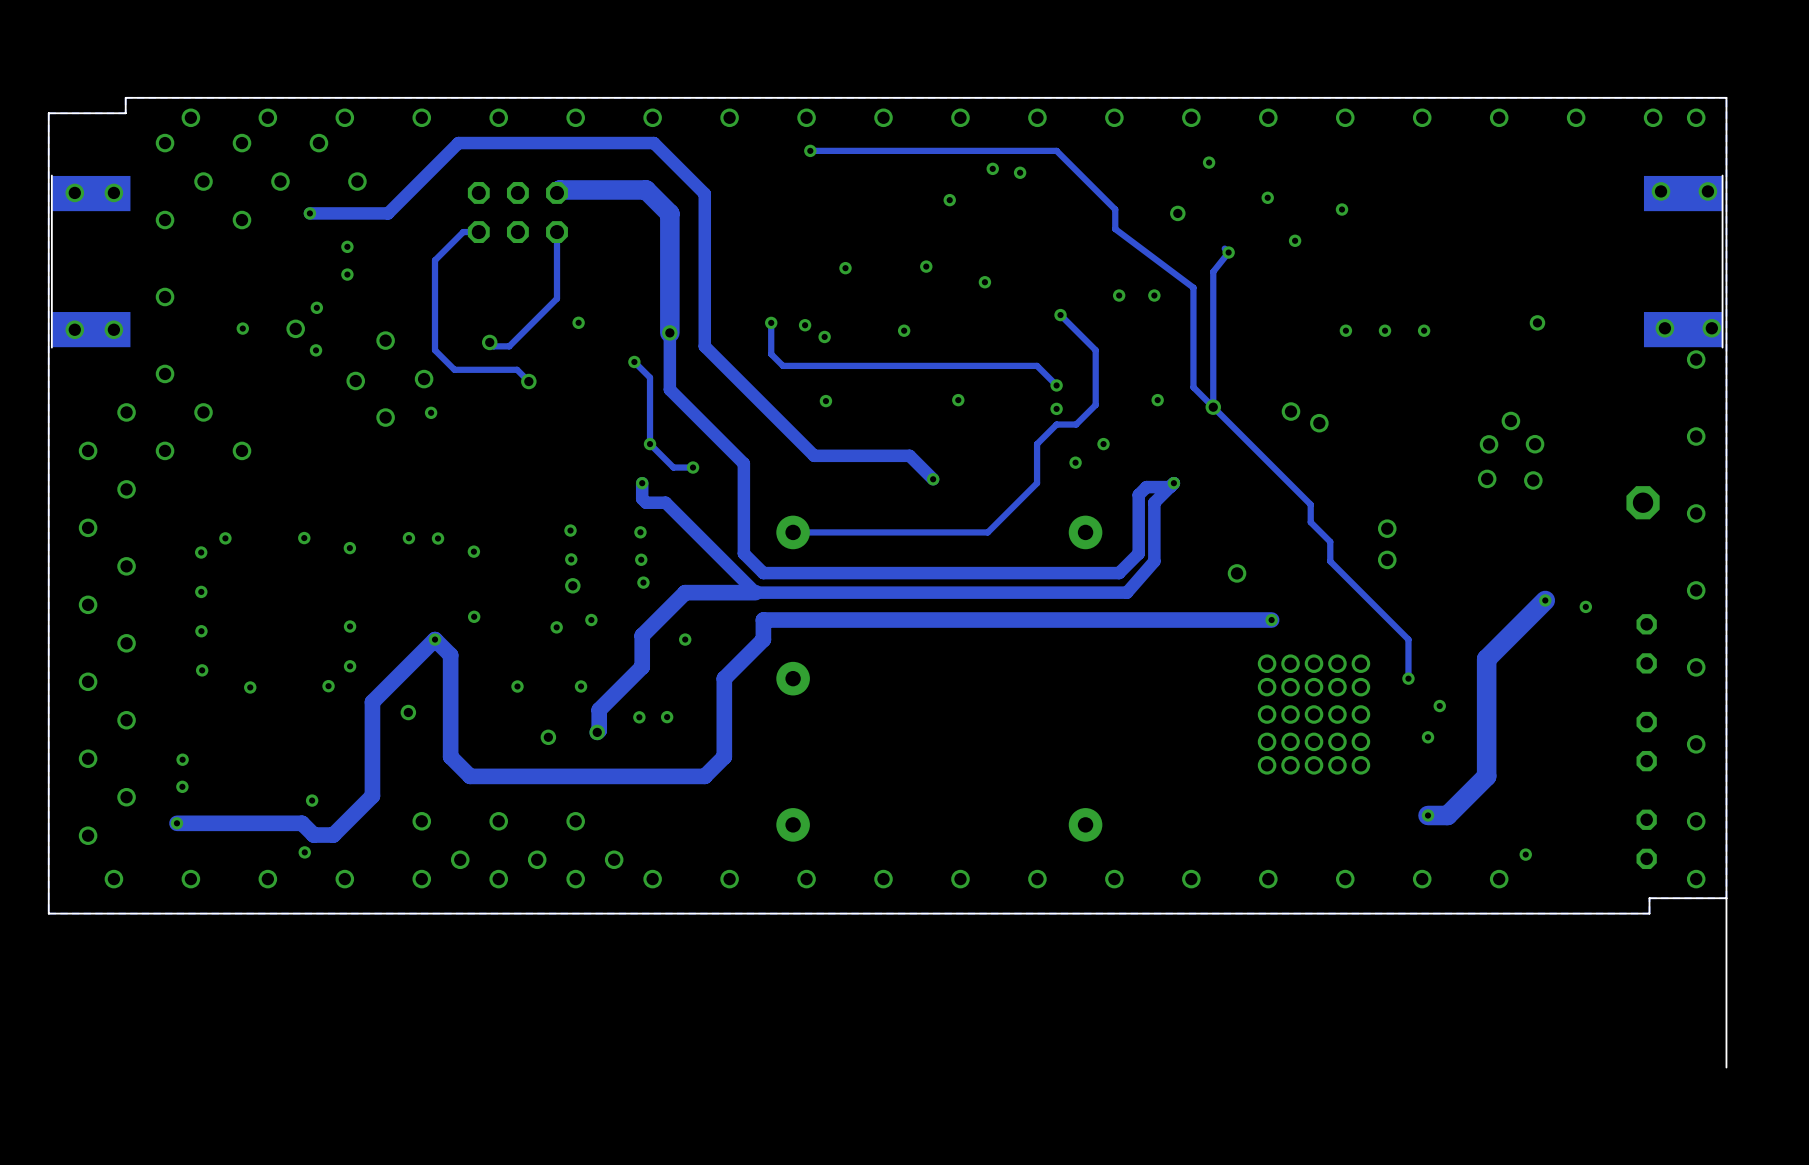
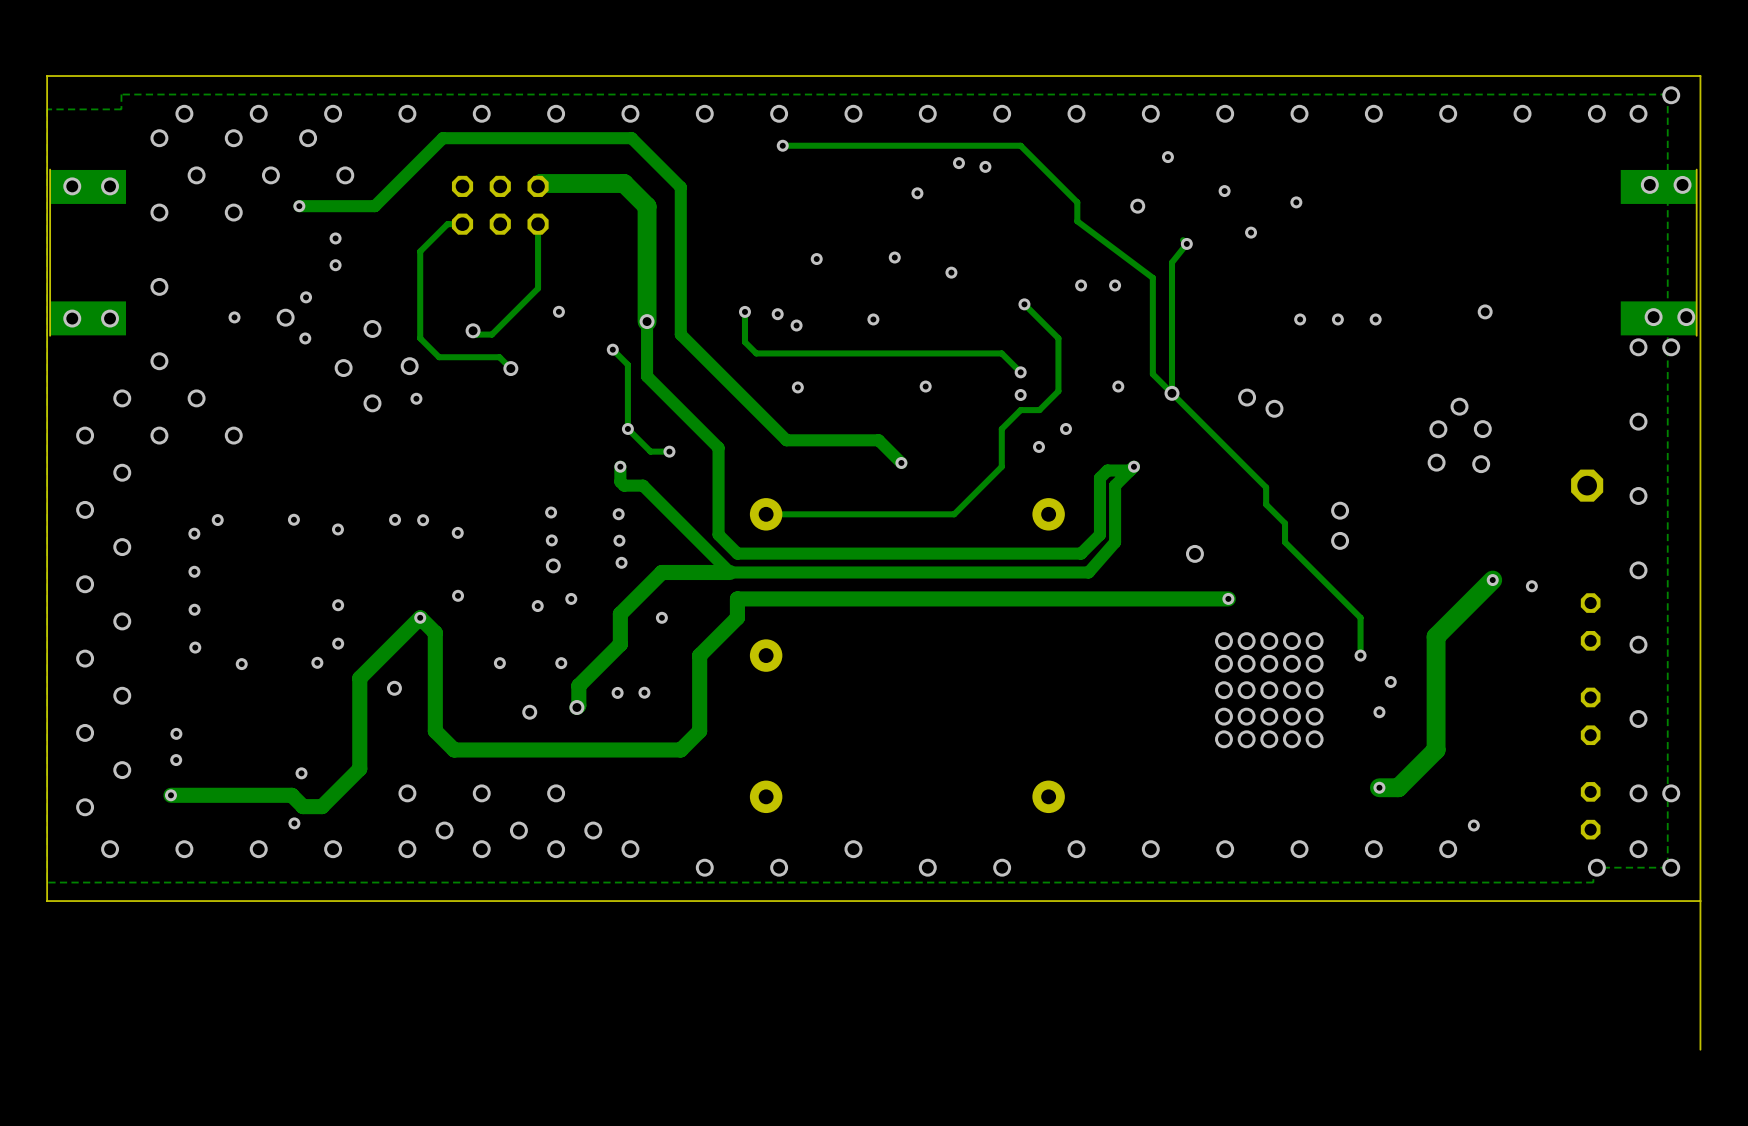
via: none -> (1671, 95)
board edge: (48, 113) (125, 113) (125, 97) (1726, 97) (1726, 1067) -> (47, 109) (47, 76) (1700, 76) (1700, 1049)
via: (1661, 191) -> none
via: none -> (1682, 184)
part position: (1683, 261) -> (1658, 252)
via: (1664, 328) -> none
via: none -> (1686, 317)
via: none -> (1671, 347)
via: none -> (1671, 793)
via position: (729, 879) -> (704, 867)
via position: (806, 879) -> (779, 867)
via position: (960, 879) -> (927, 867)
via position: (1037, 879) -> (1002, 867)
via: none -> (1596, 867)
board edge: (1726, 898) (1649, 898) (1649, 913) (48, 913) -> (1700, 901) (47, 901) (47, 882)
via: none -> (1671, 867)

